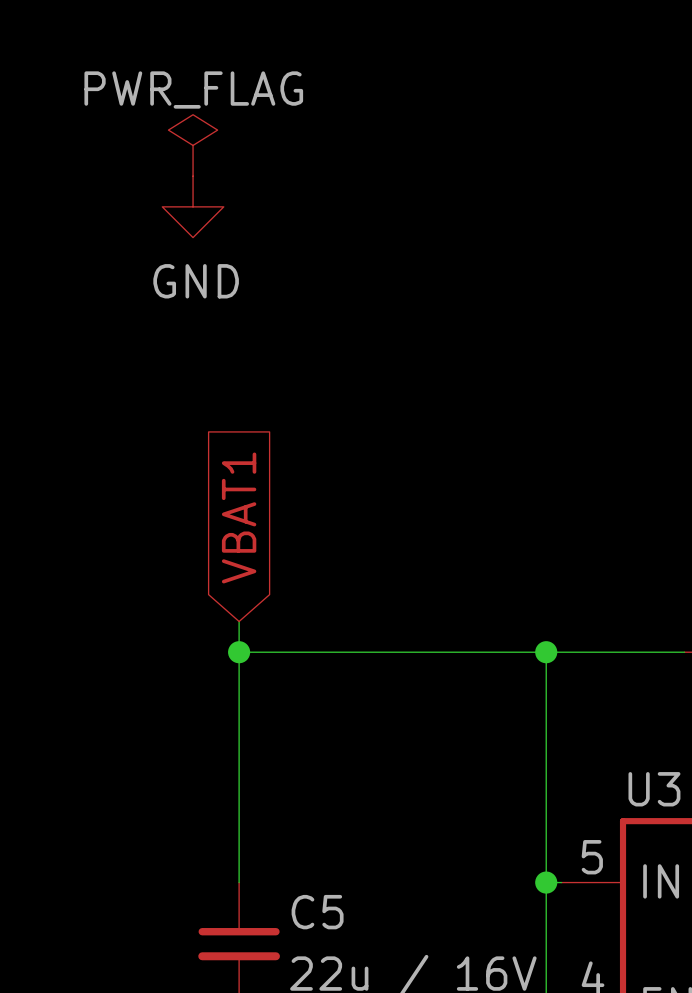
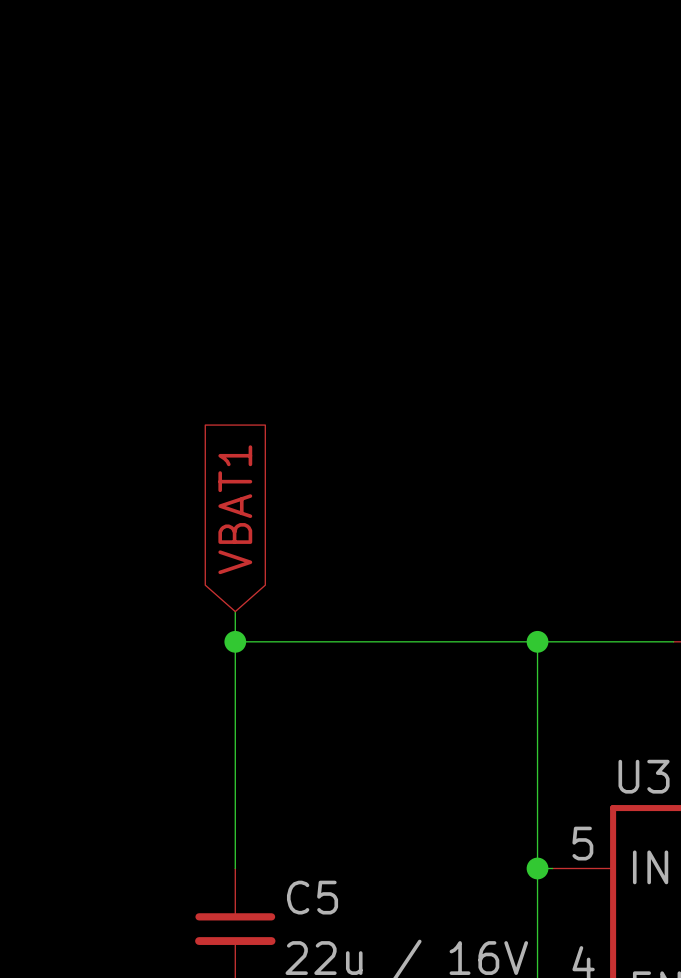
power symbol: PWR_FLAG (193, 145) -> none
power symbol: GND (193, 206) -> none

